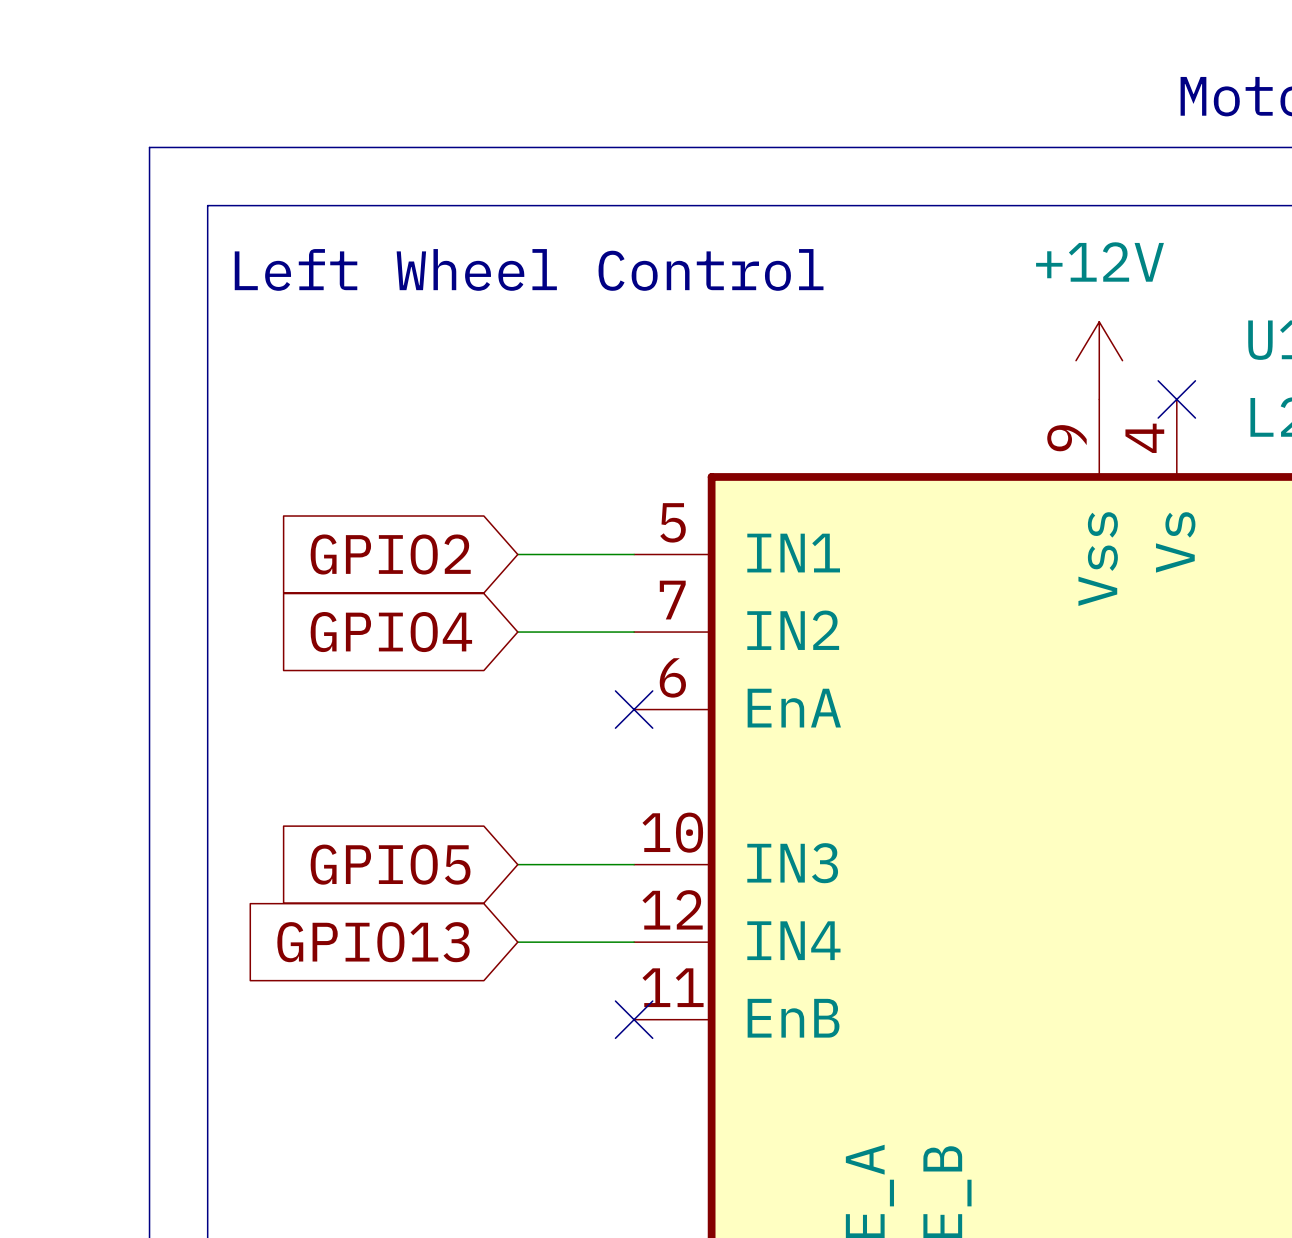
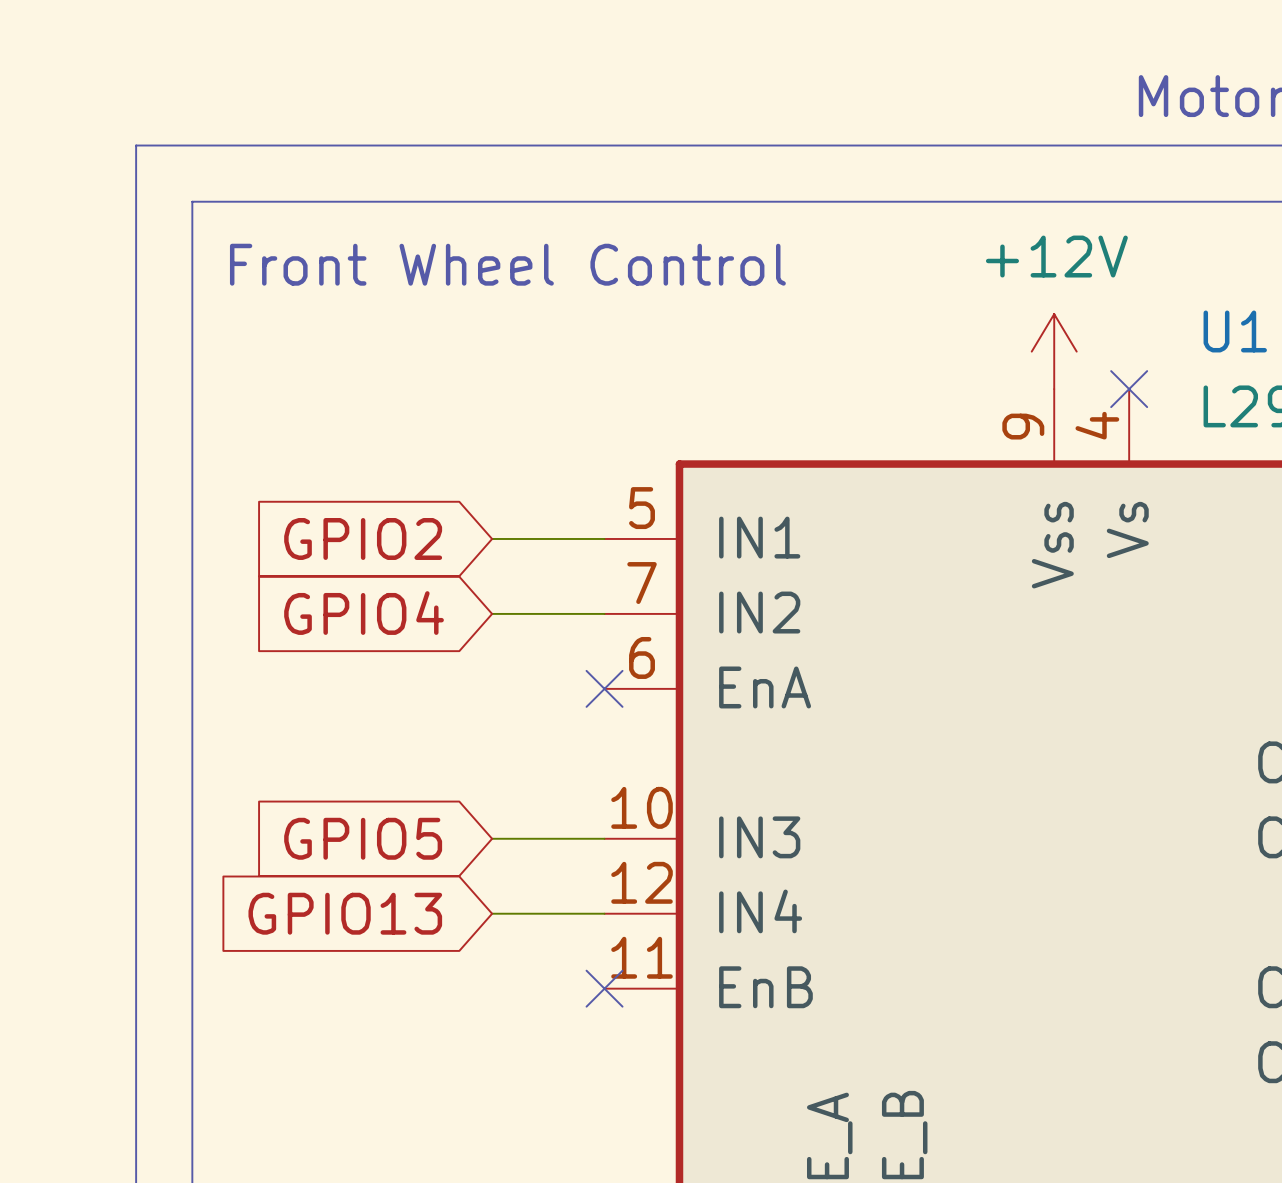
text: Left Wheel Control (529, 269) -> Front Wheel Control (507, 264)

